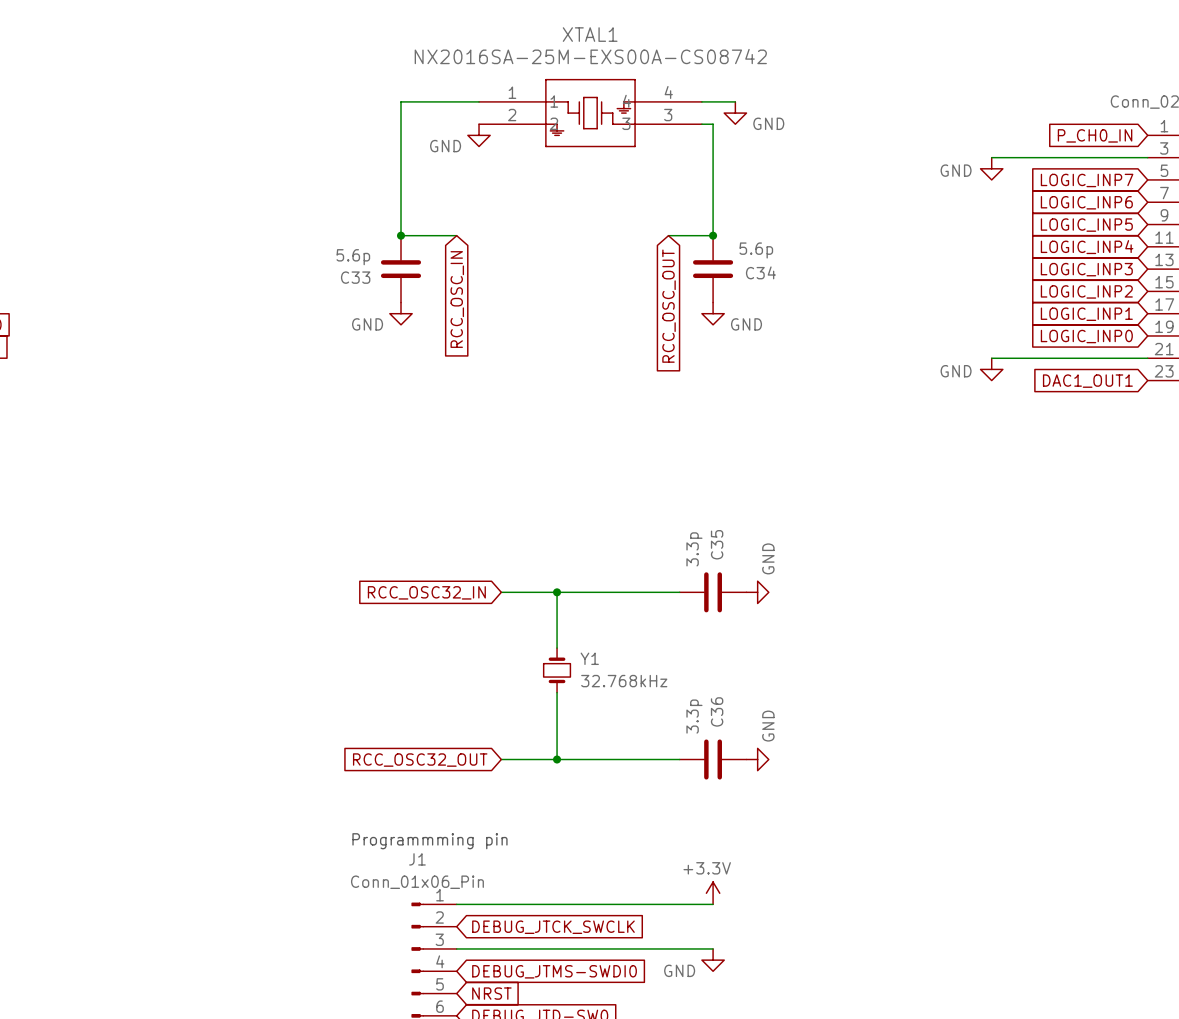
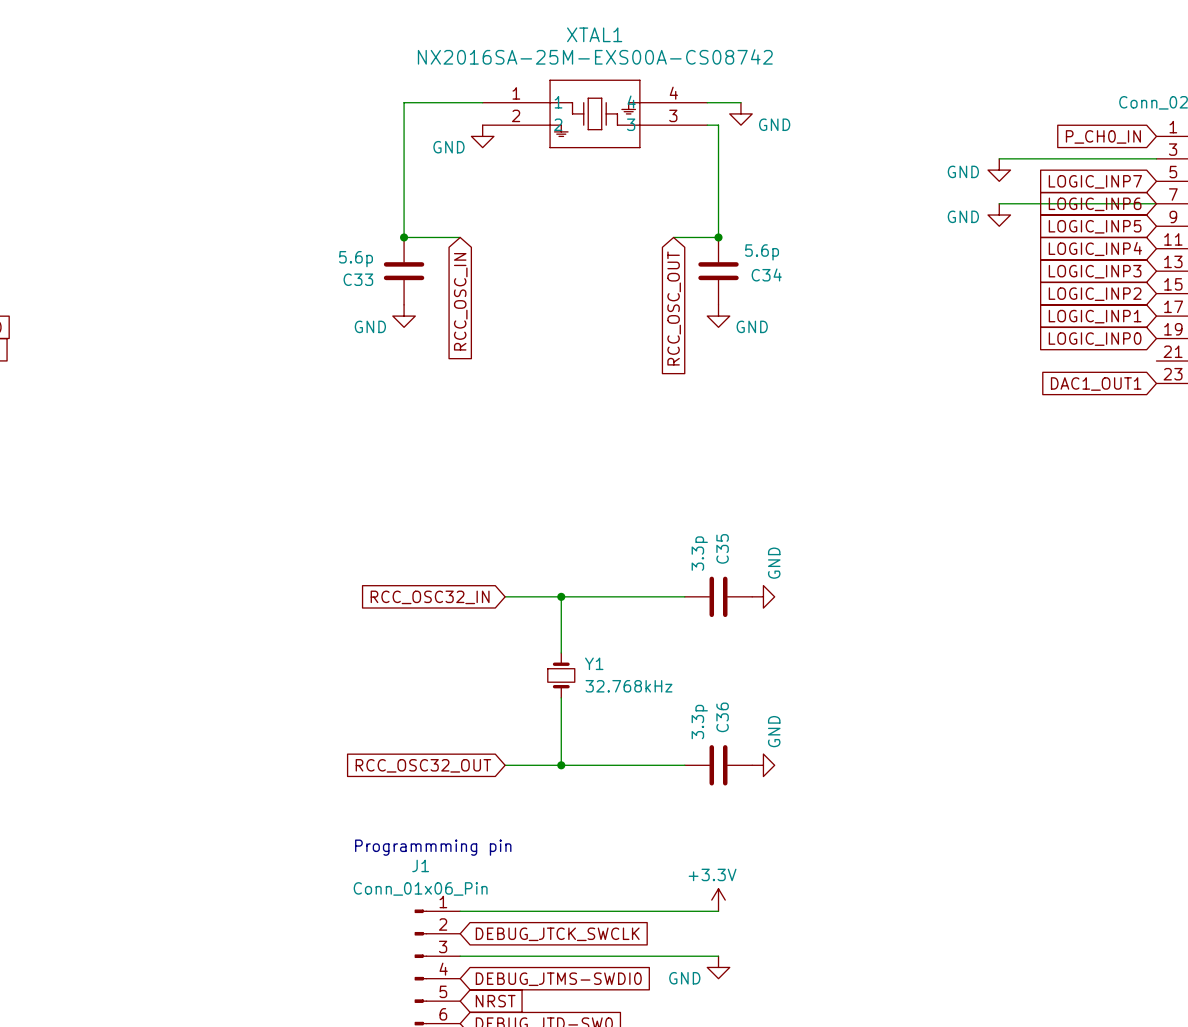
wire: (991, 358) (1147, 358) -> (999, 203) (1156, 203)
power symbol position: GND (991, 369) -> GND (999, 215)

